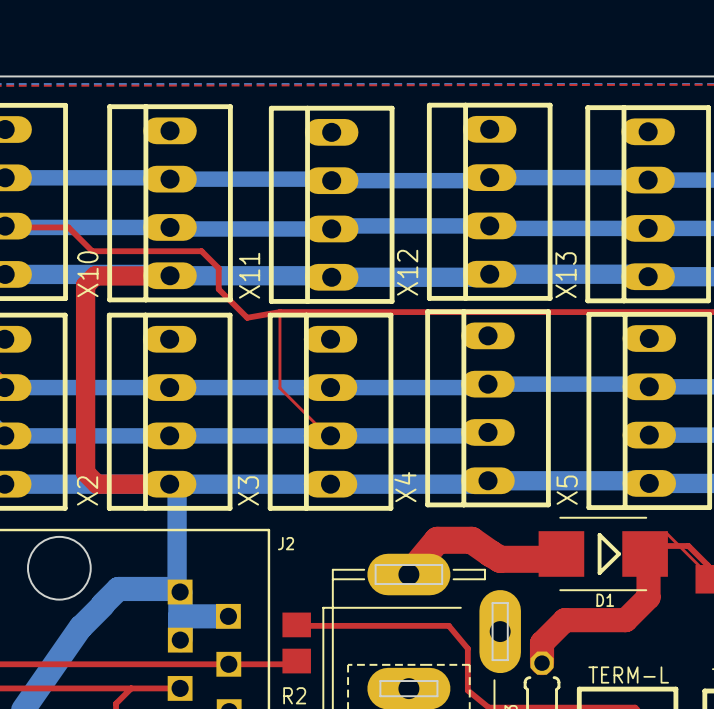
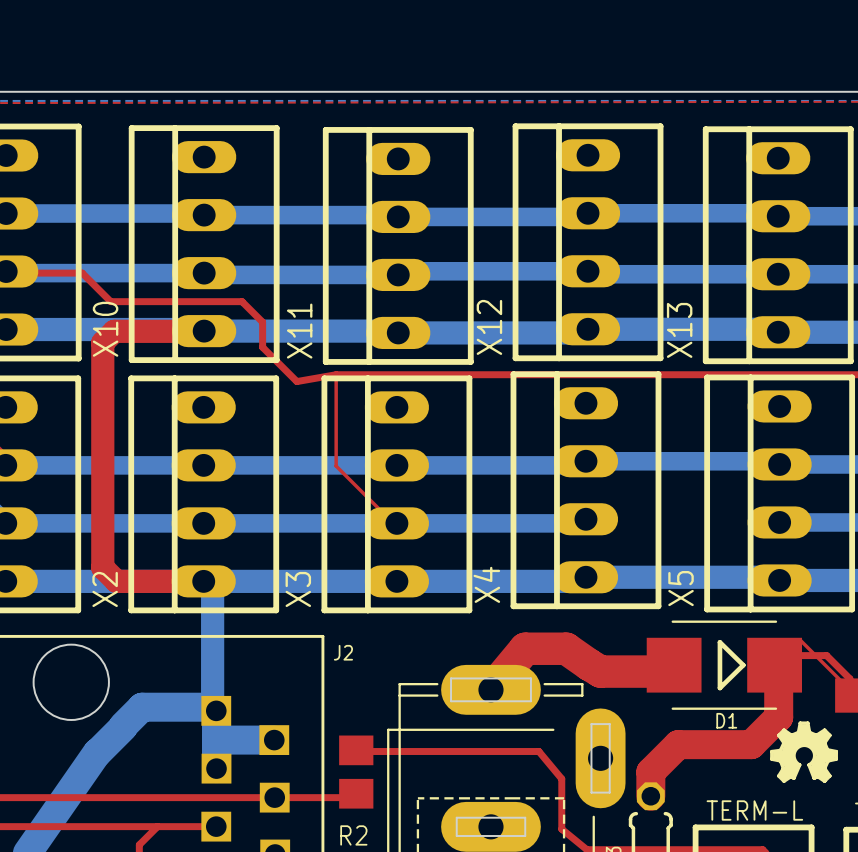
drawing: none -> [770, 721, 838, 783]

